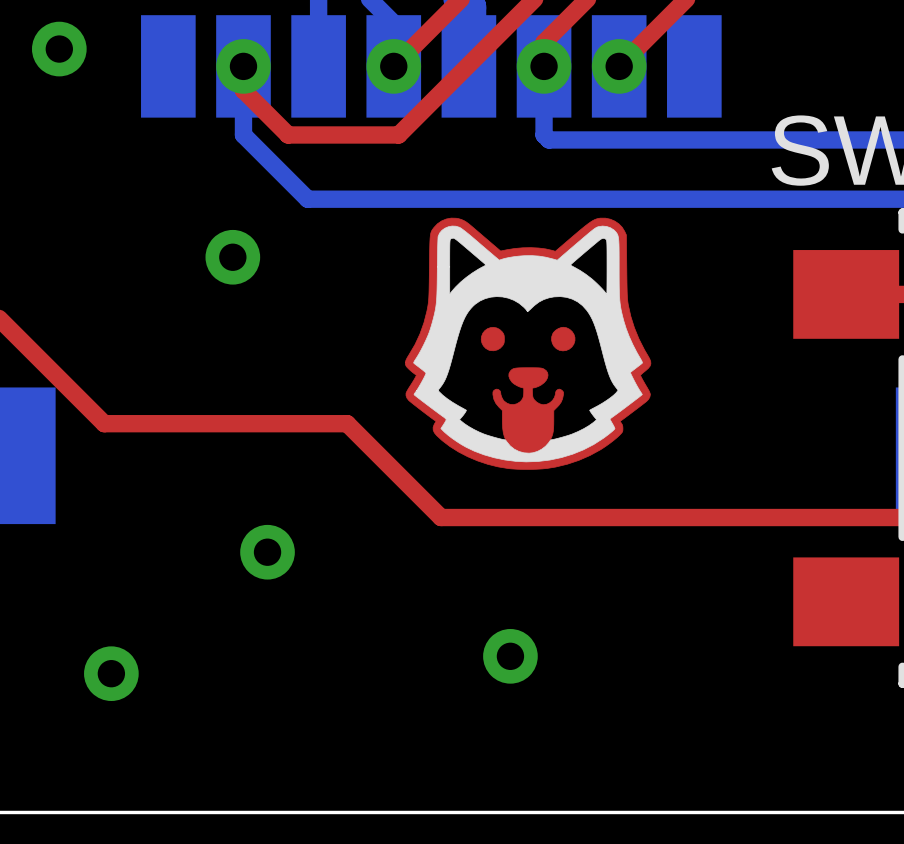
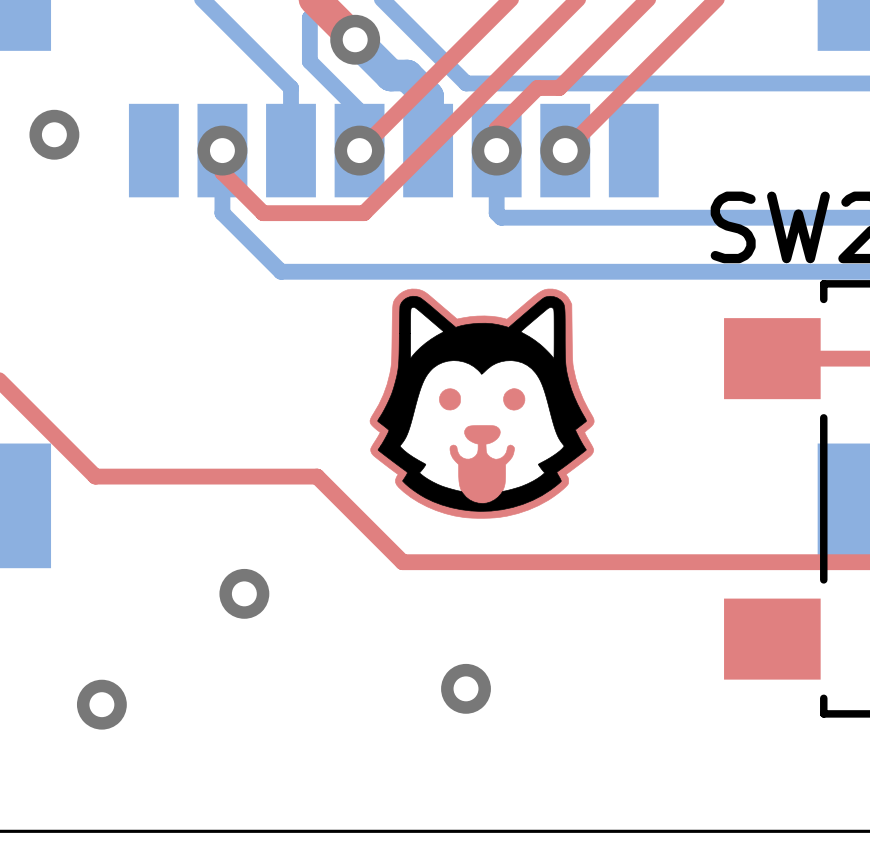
via: (232, 257) -> none

